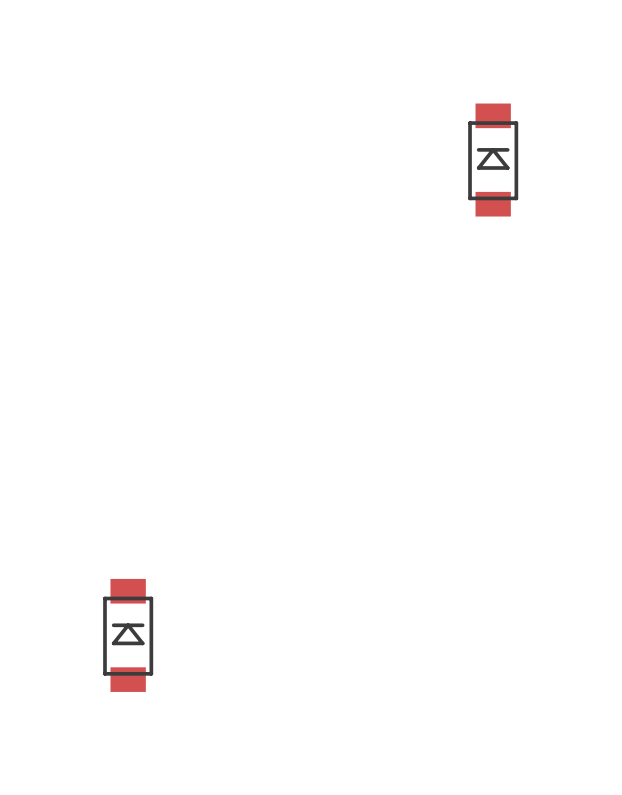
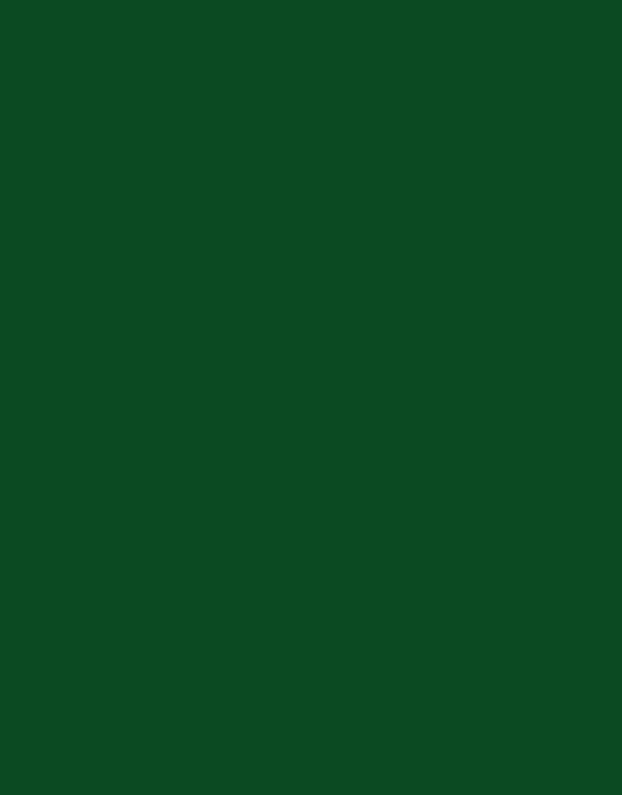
part: (493, 160) -> none
part: (128, 635) -> none

